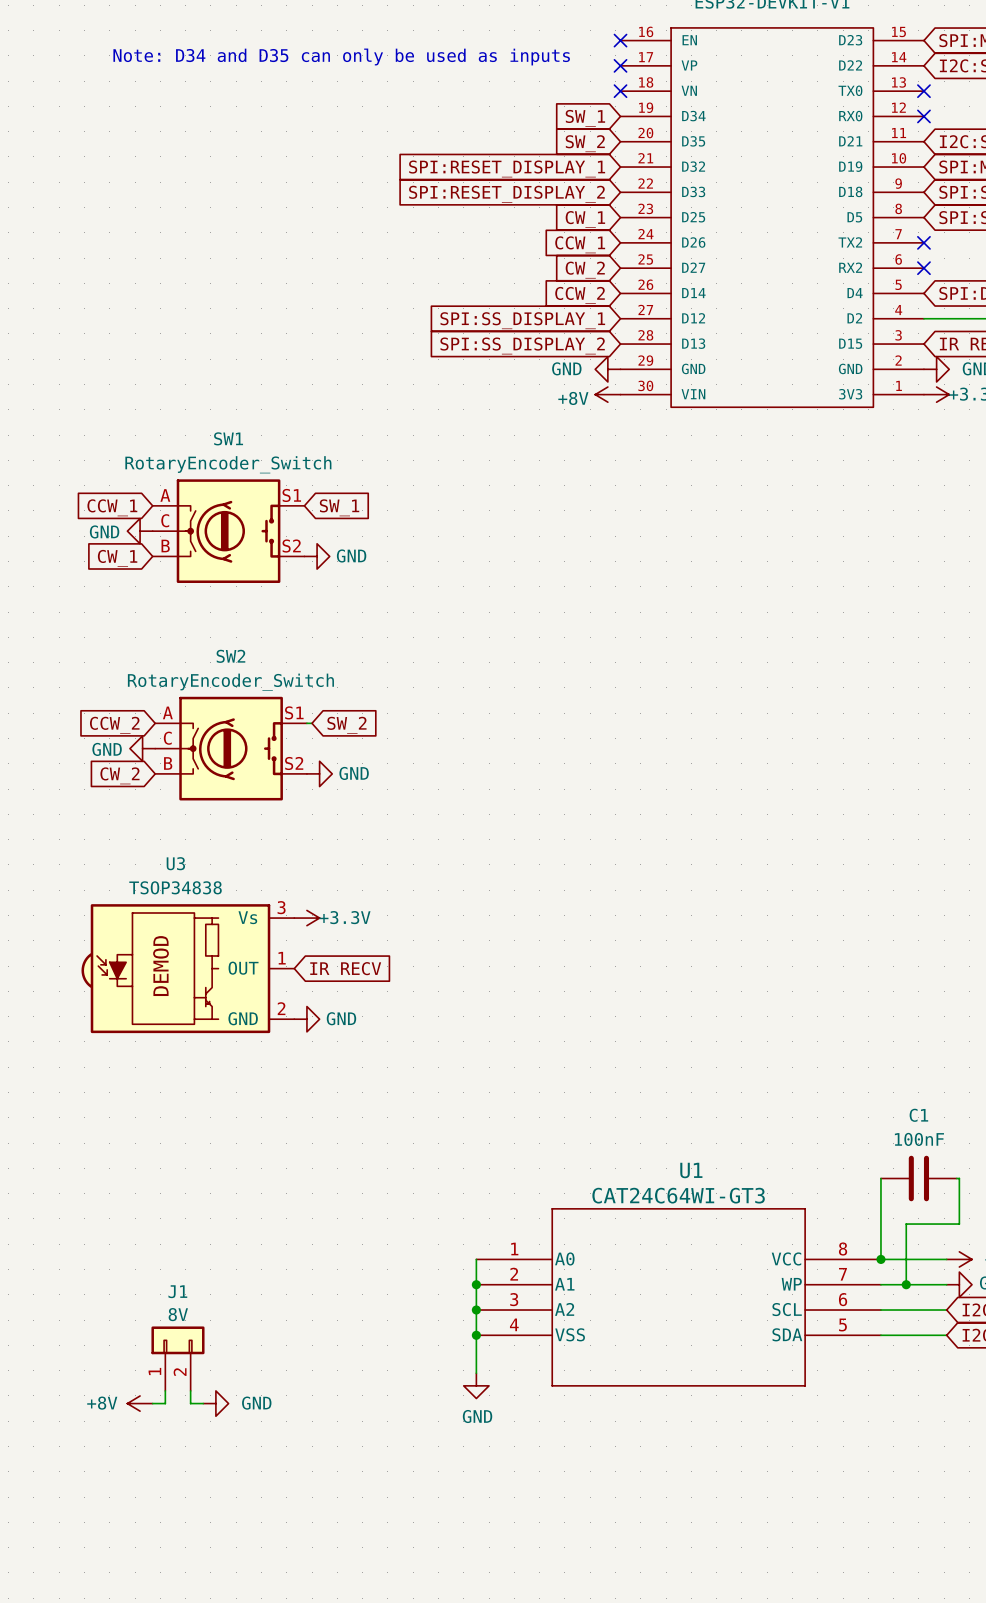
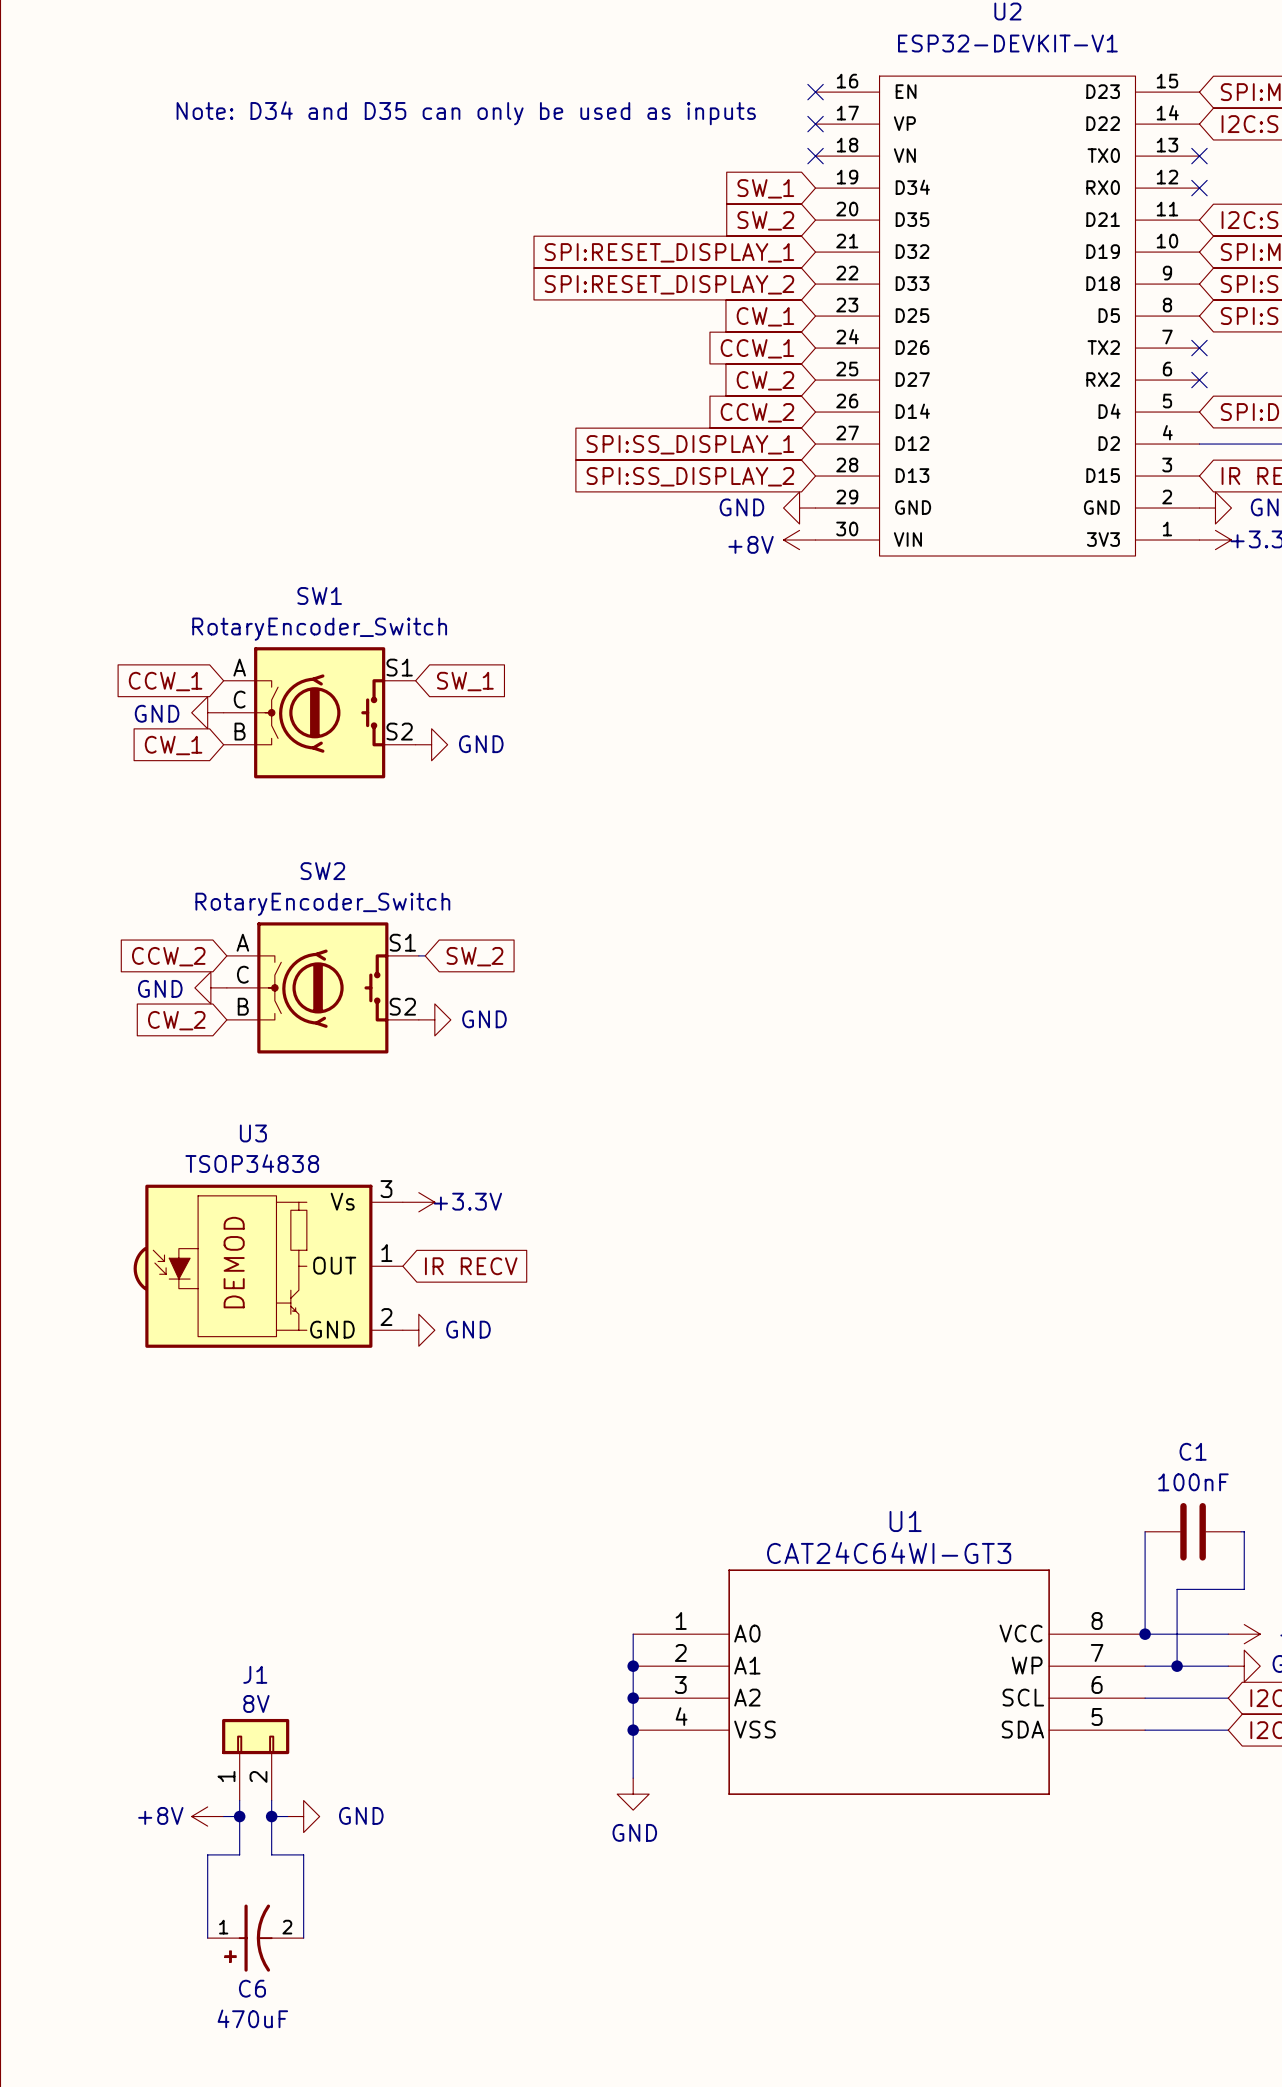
wire: none -> (239, 1816) (239, 1854) (207, 1854) (207, 1938)
junction: none -> (239, 1816)
wire: none -> (271, 1816) (271, 1854) (303, 1854) (303, 1938)
junction: none -> (271, 1816)
C6: none -> 470uF (255, 1938)

